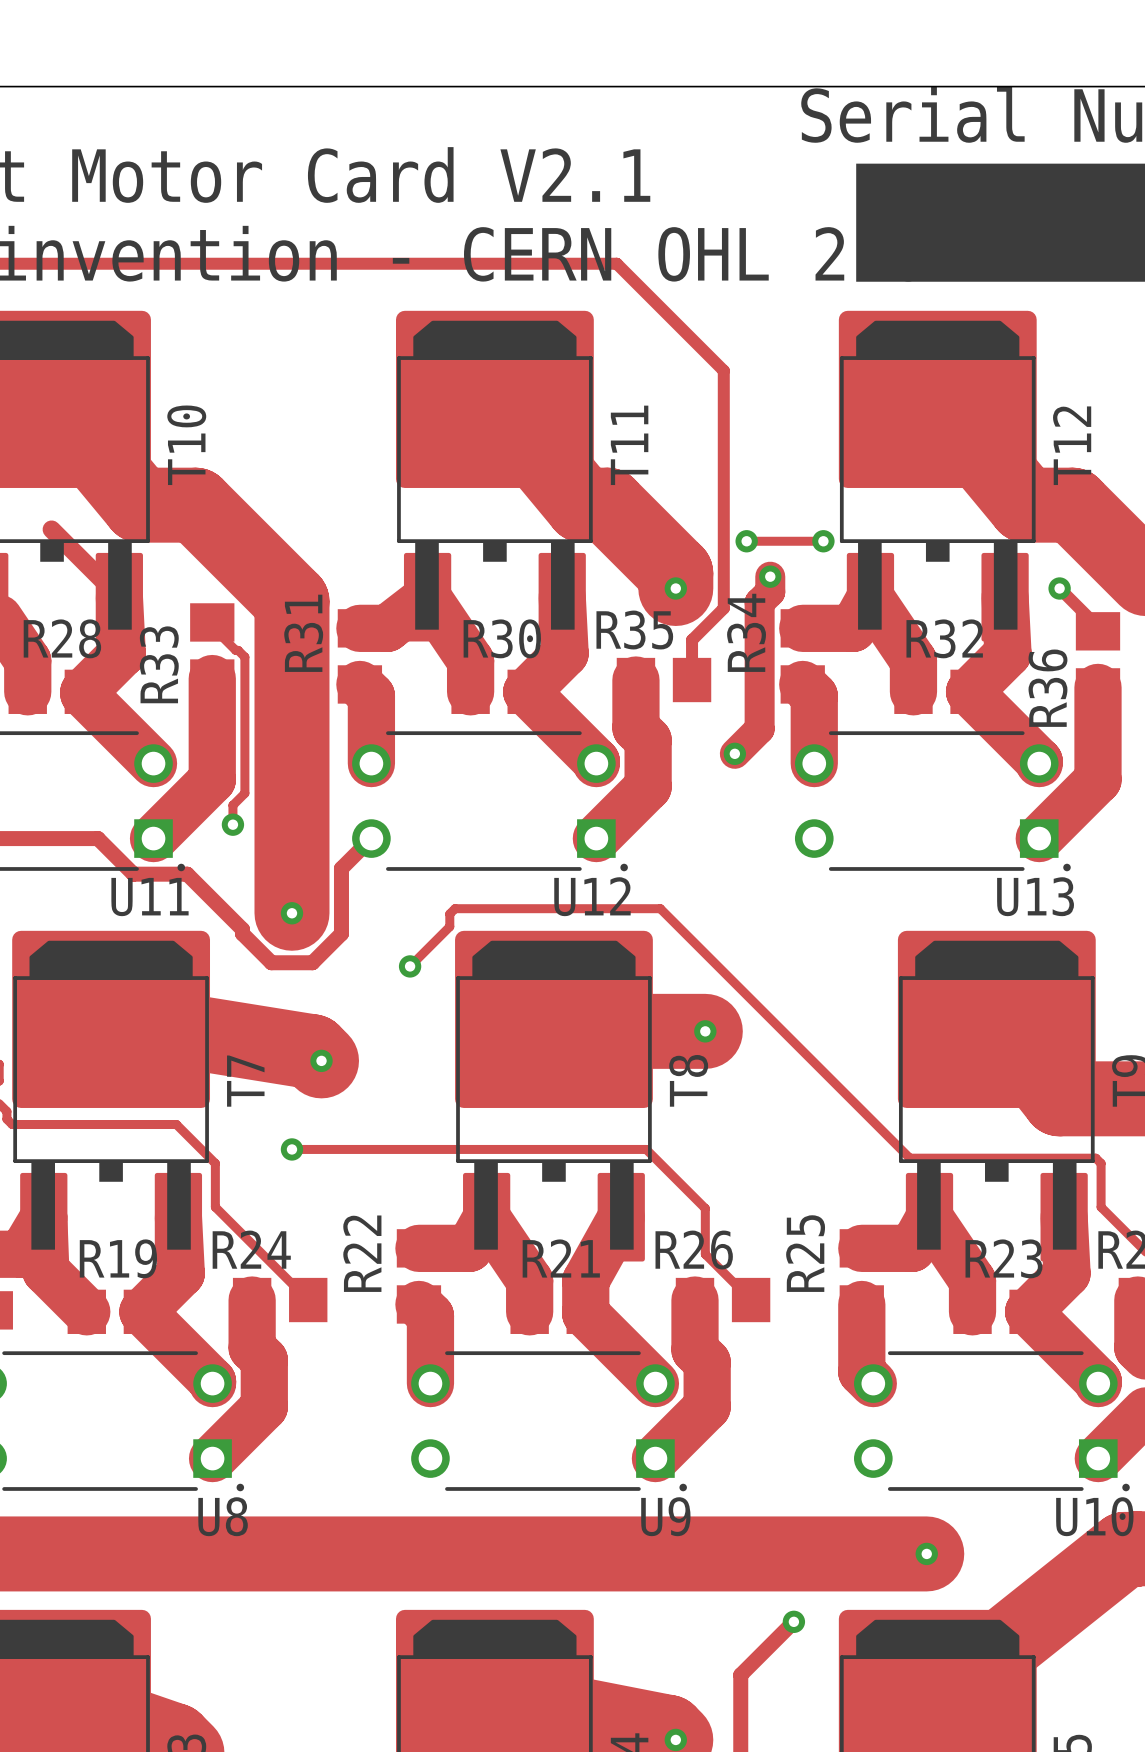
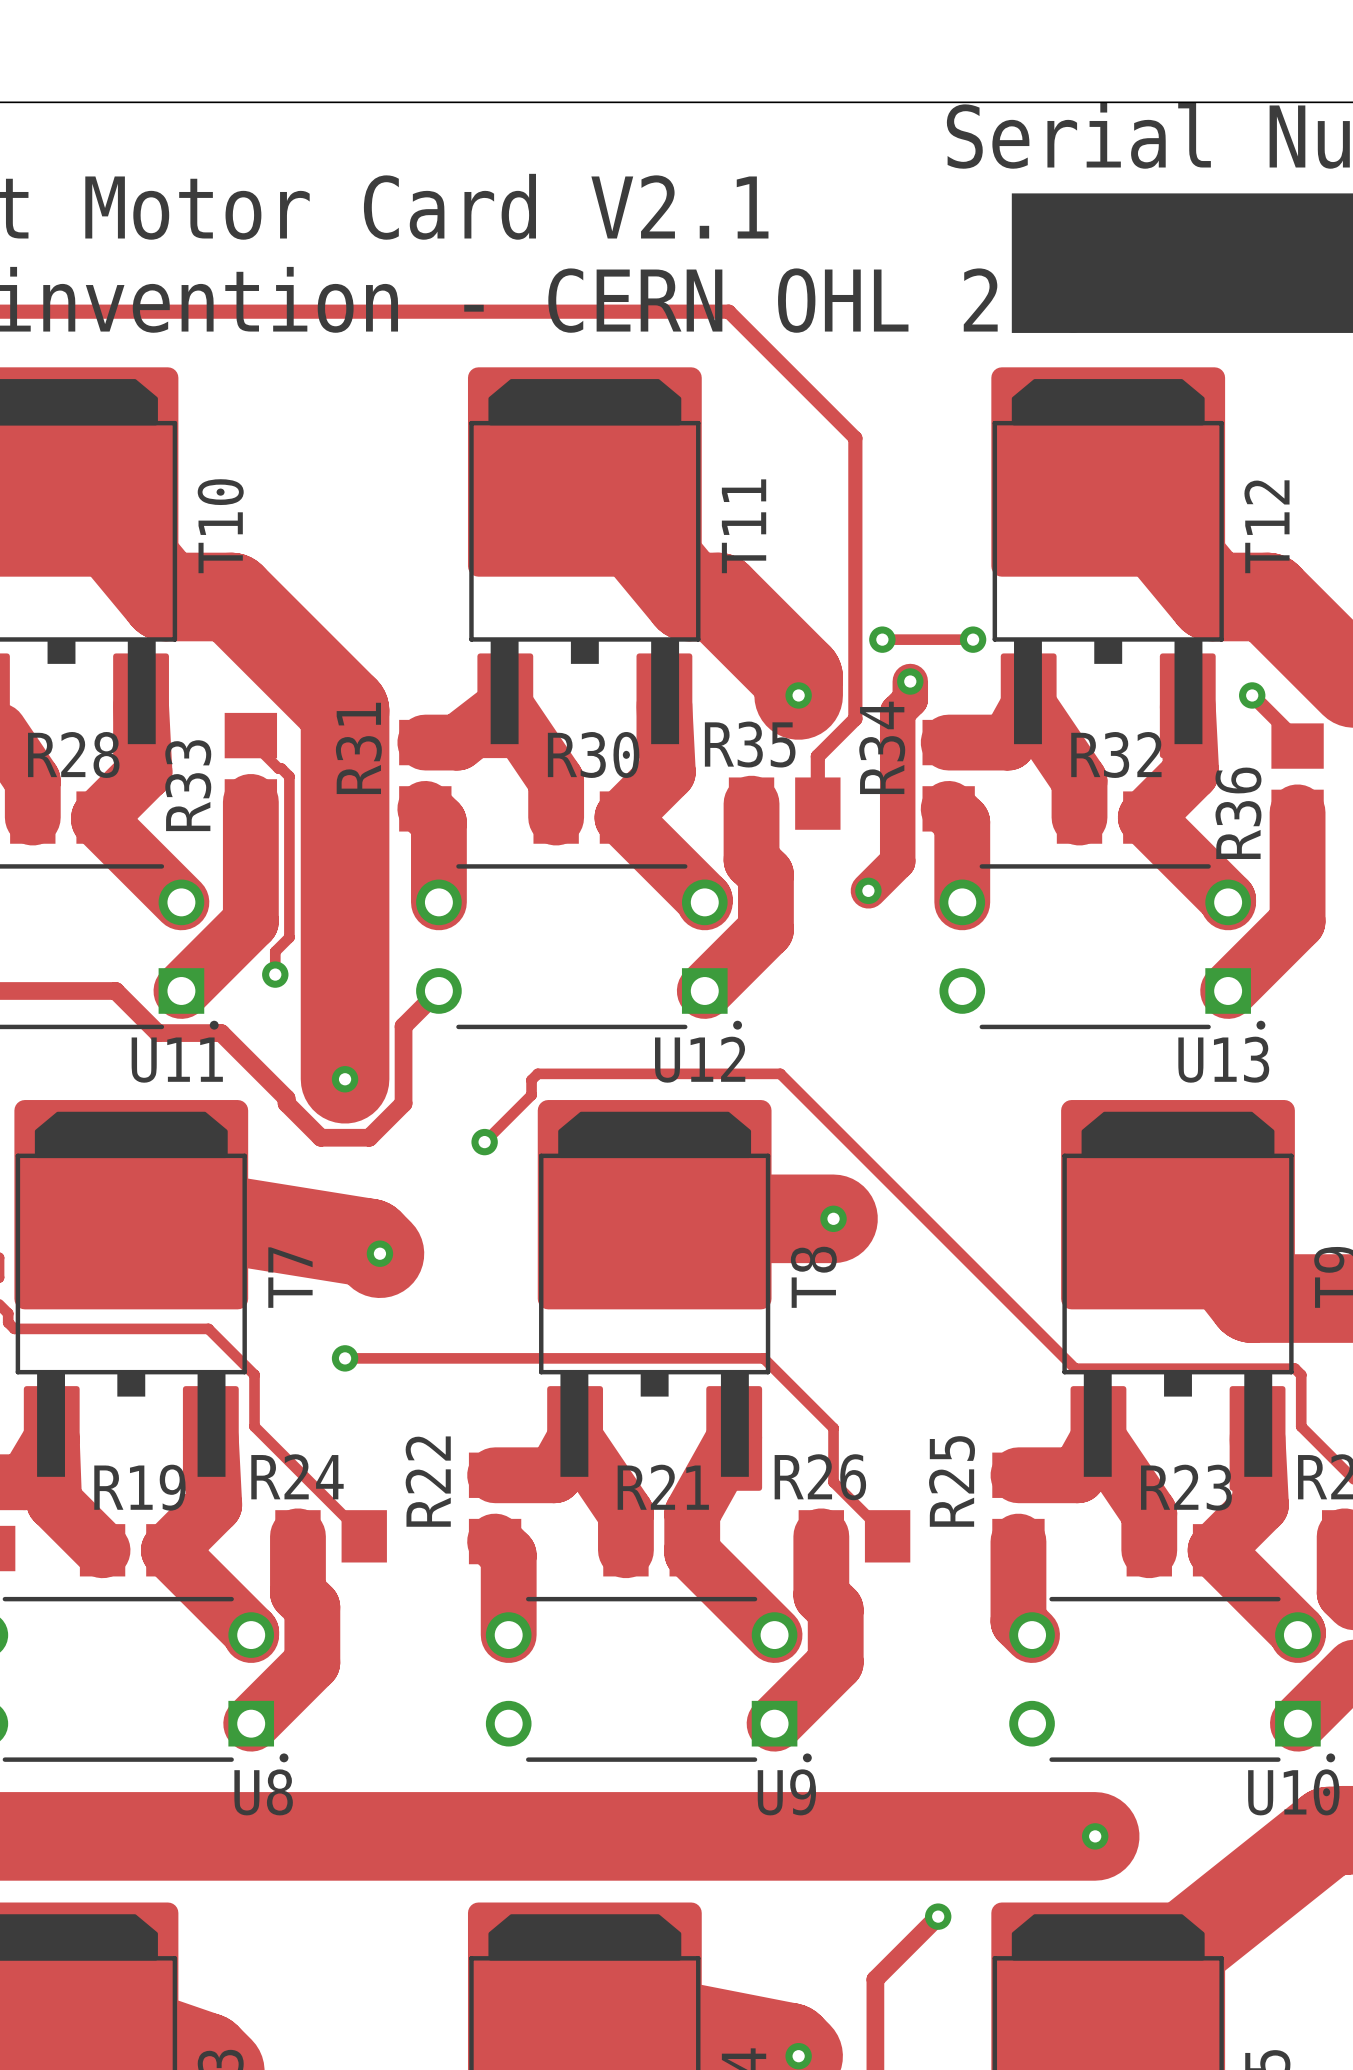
track: (51, 529) (119, 597) -> none

